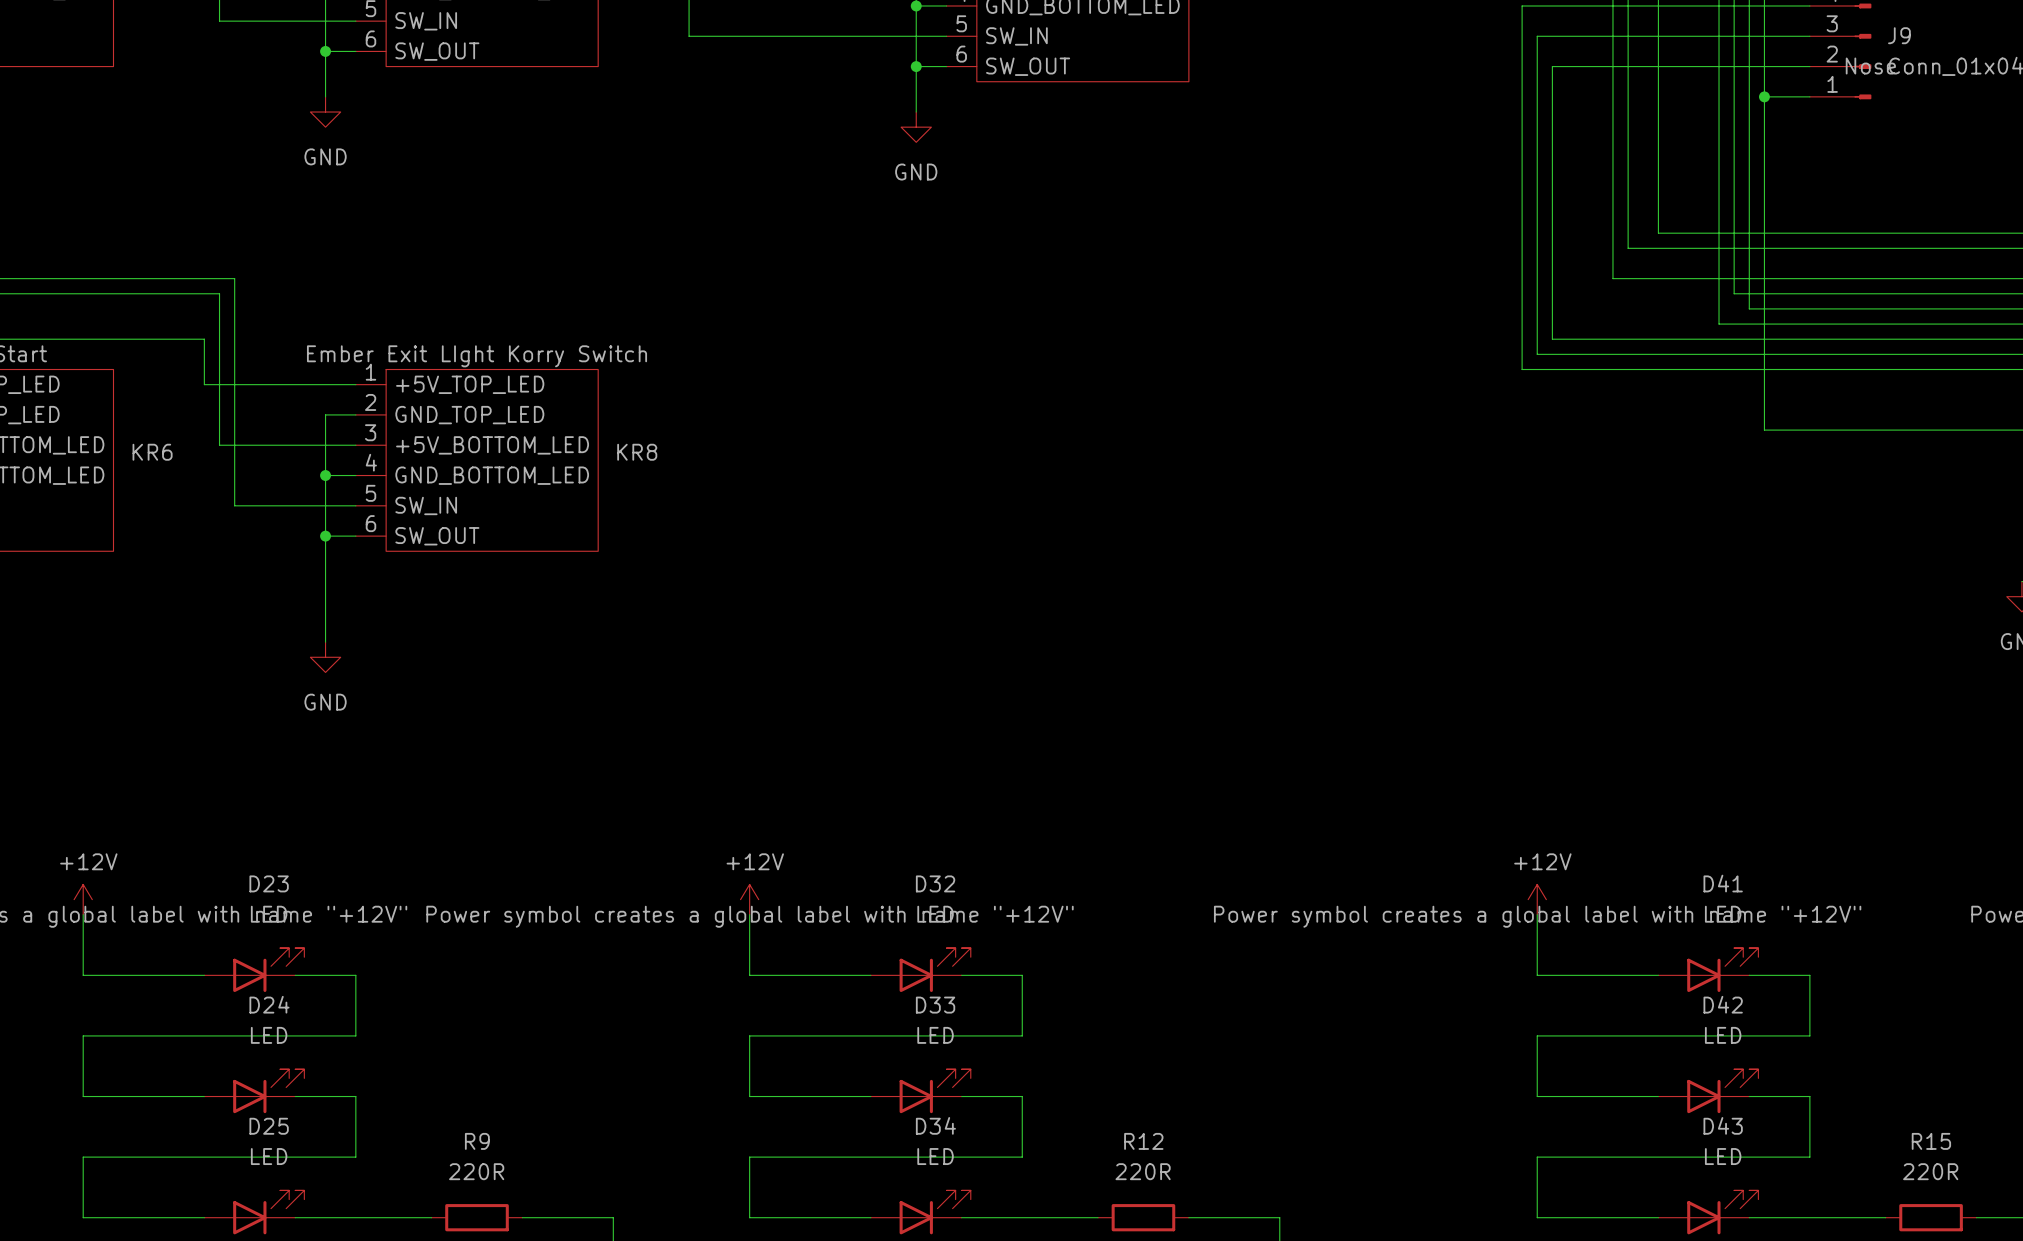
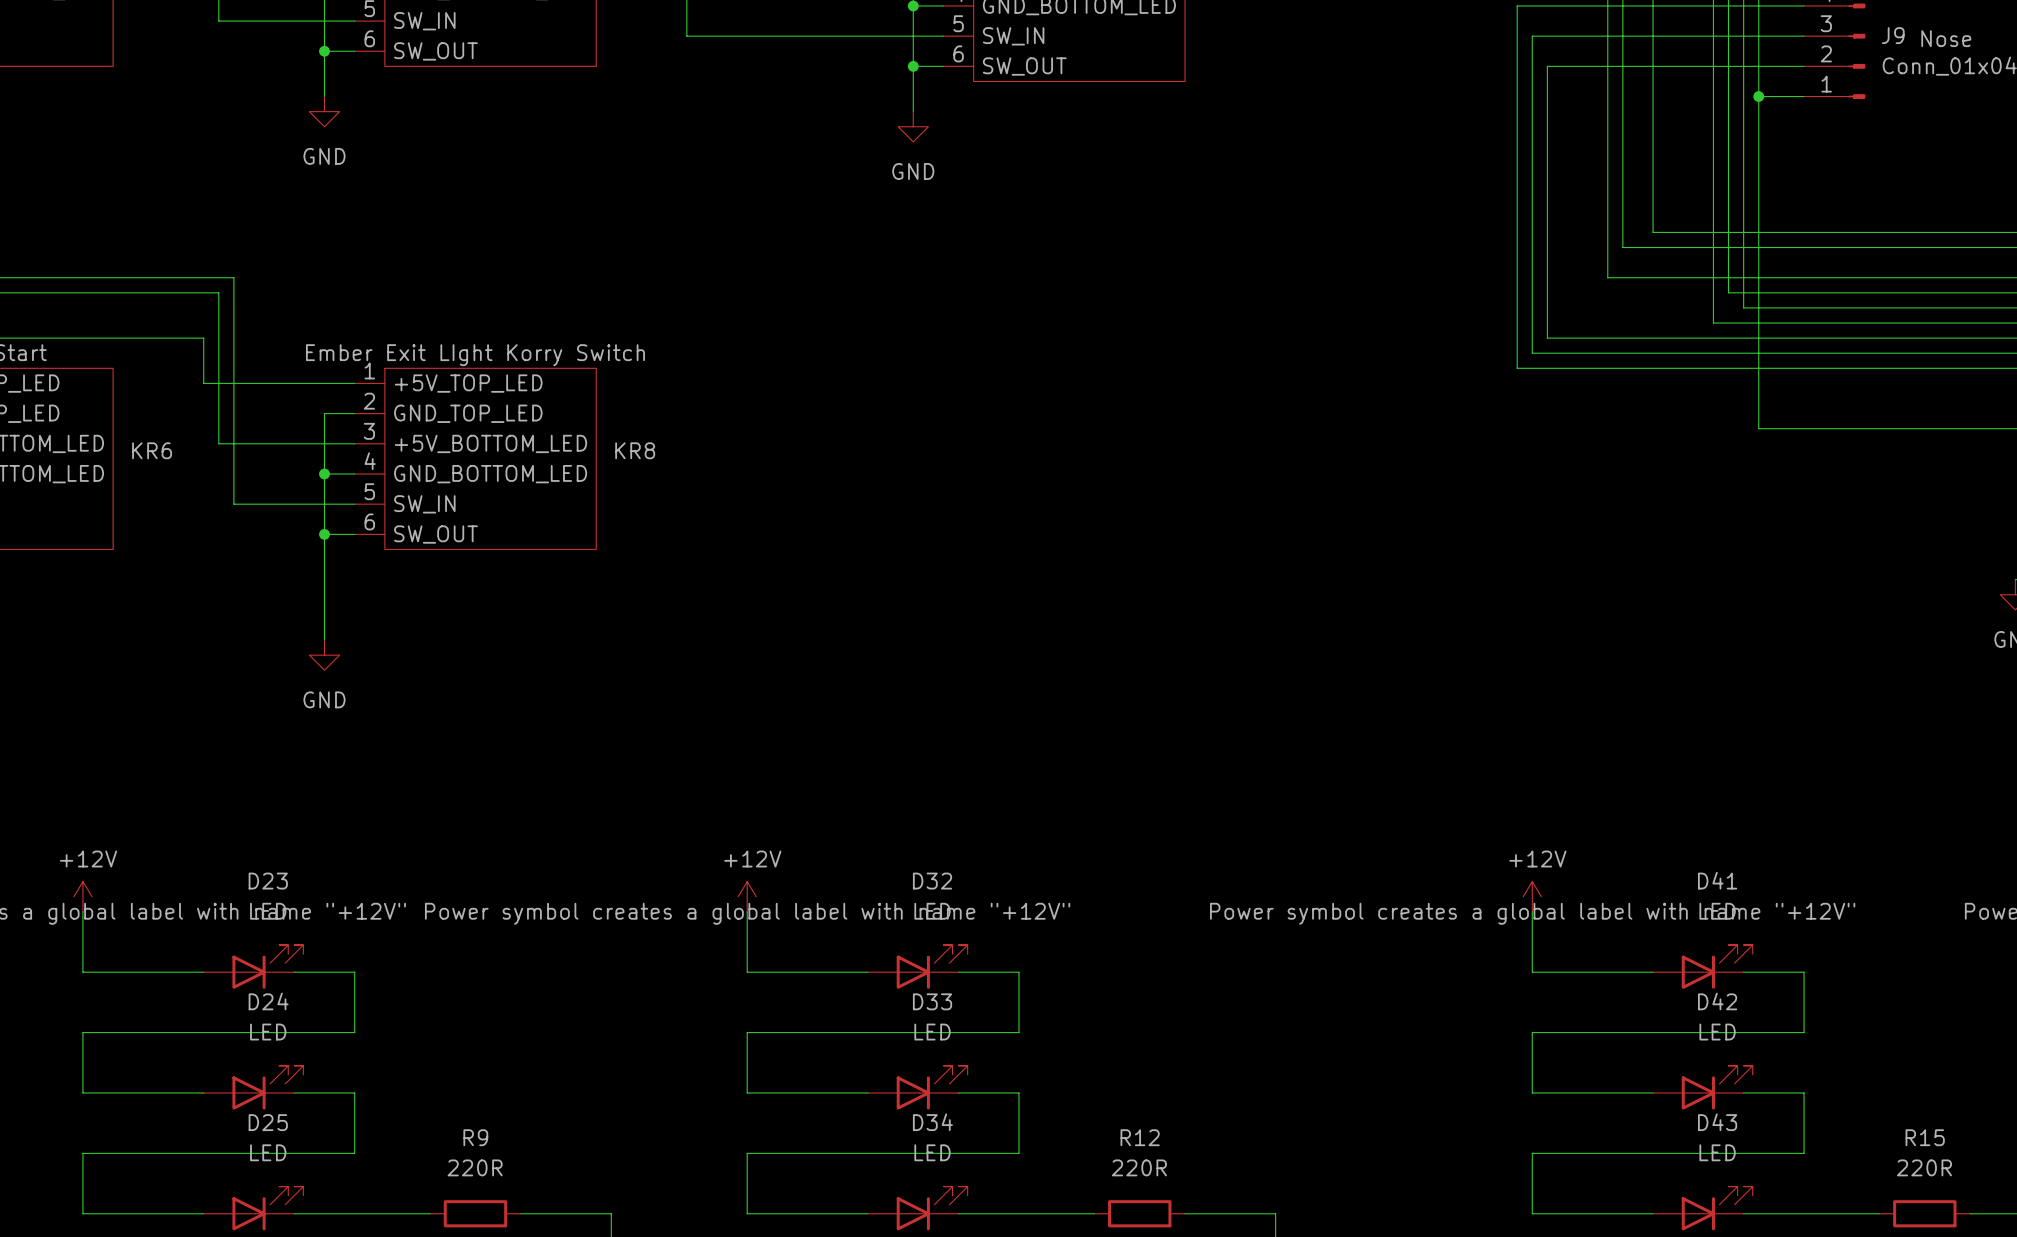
J9 text position: Nose (1870, 66) -> Nose (1946, 38)

